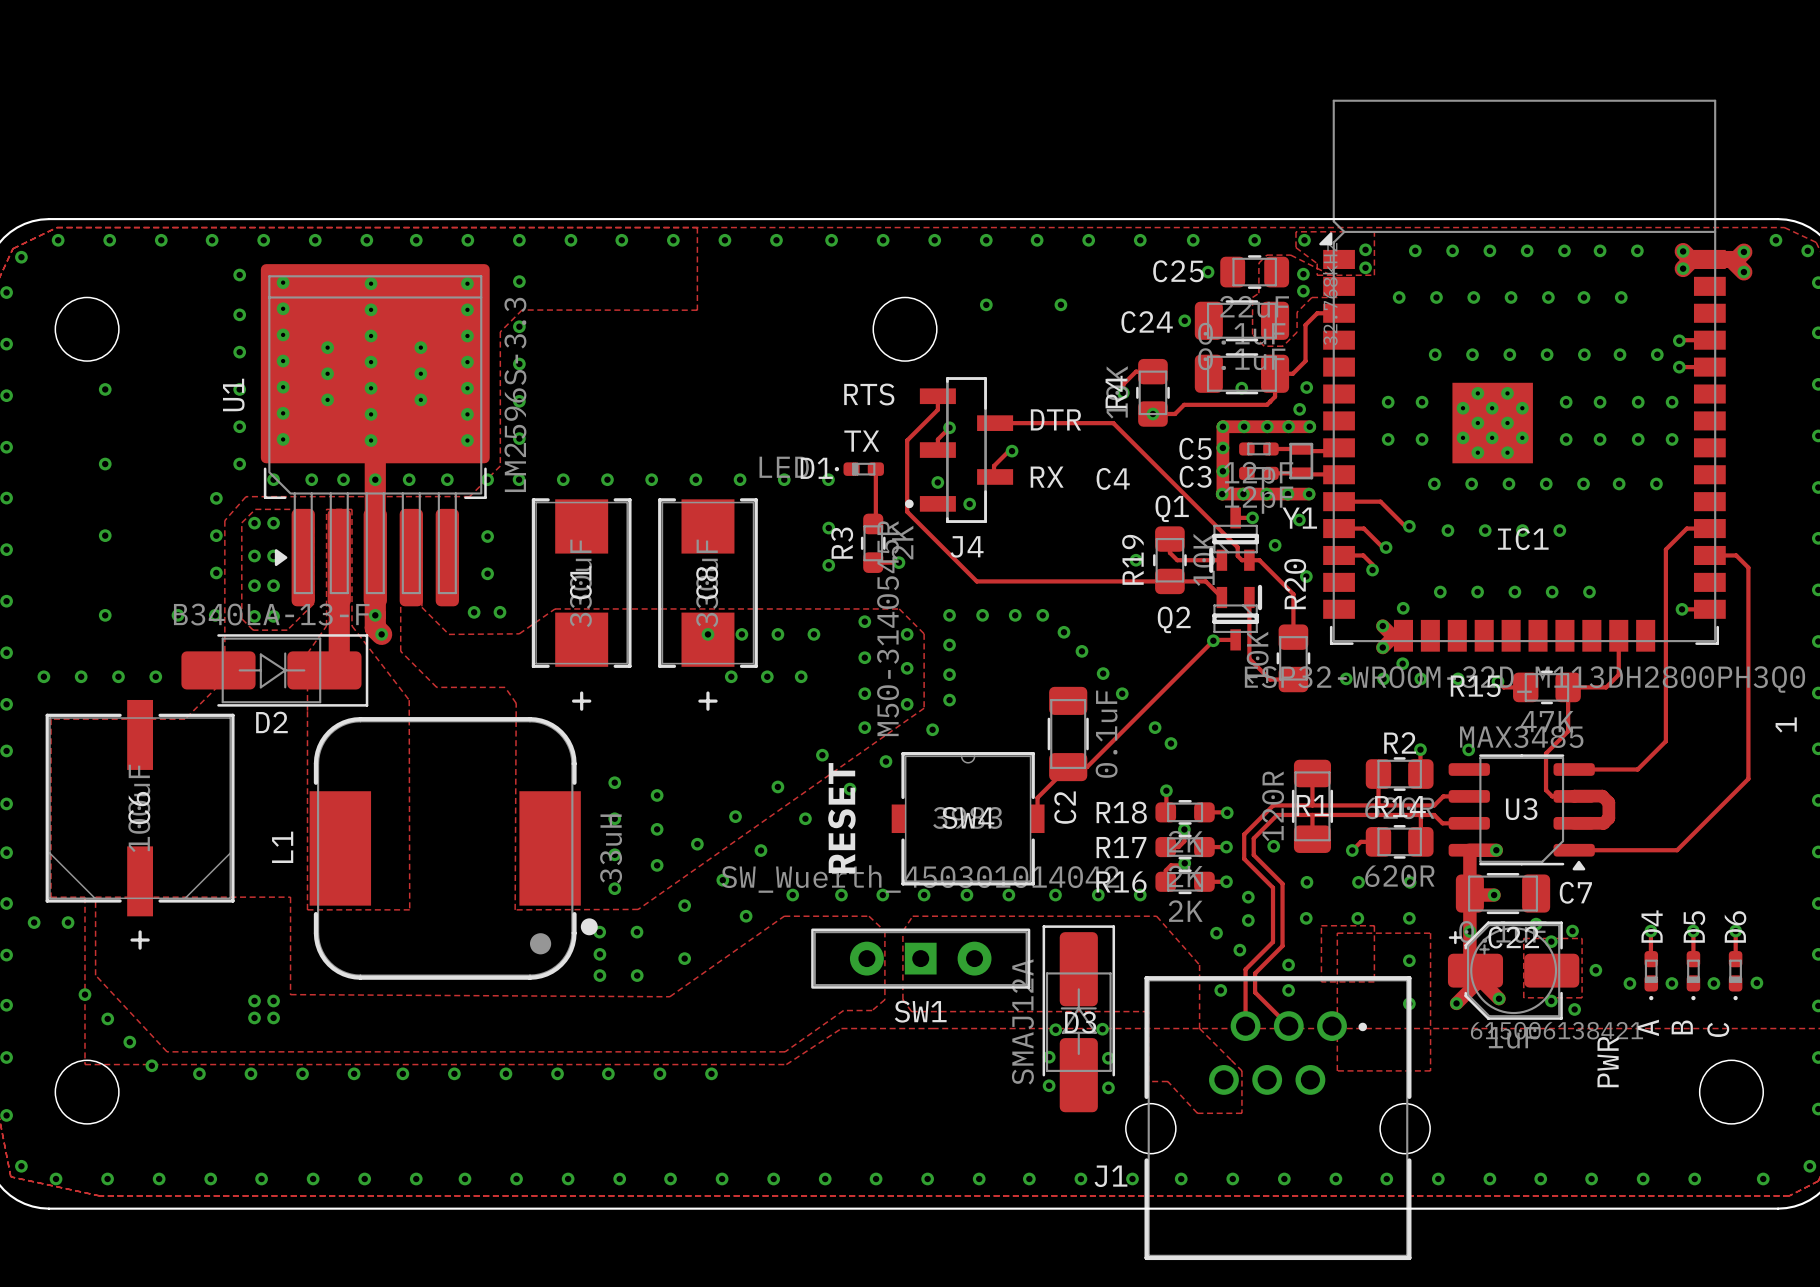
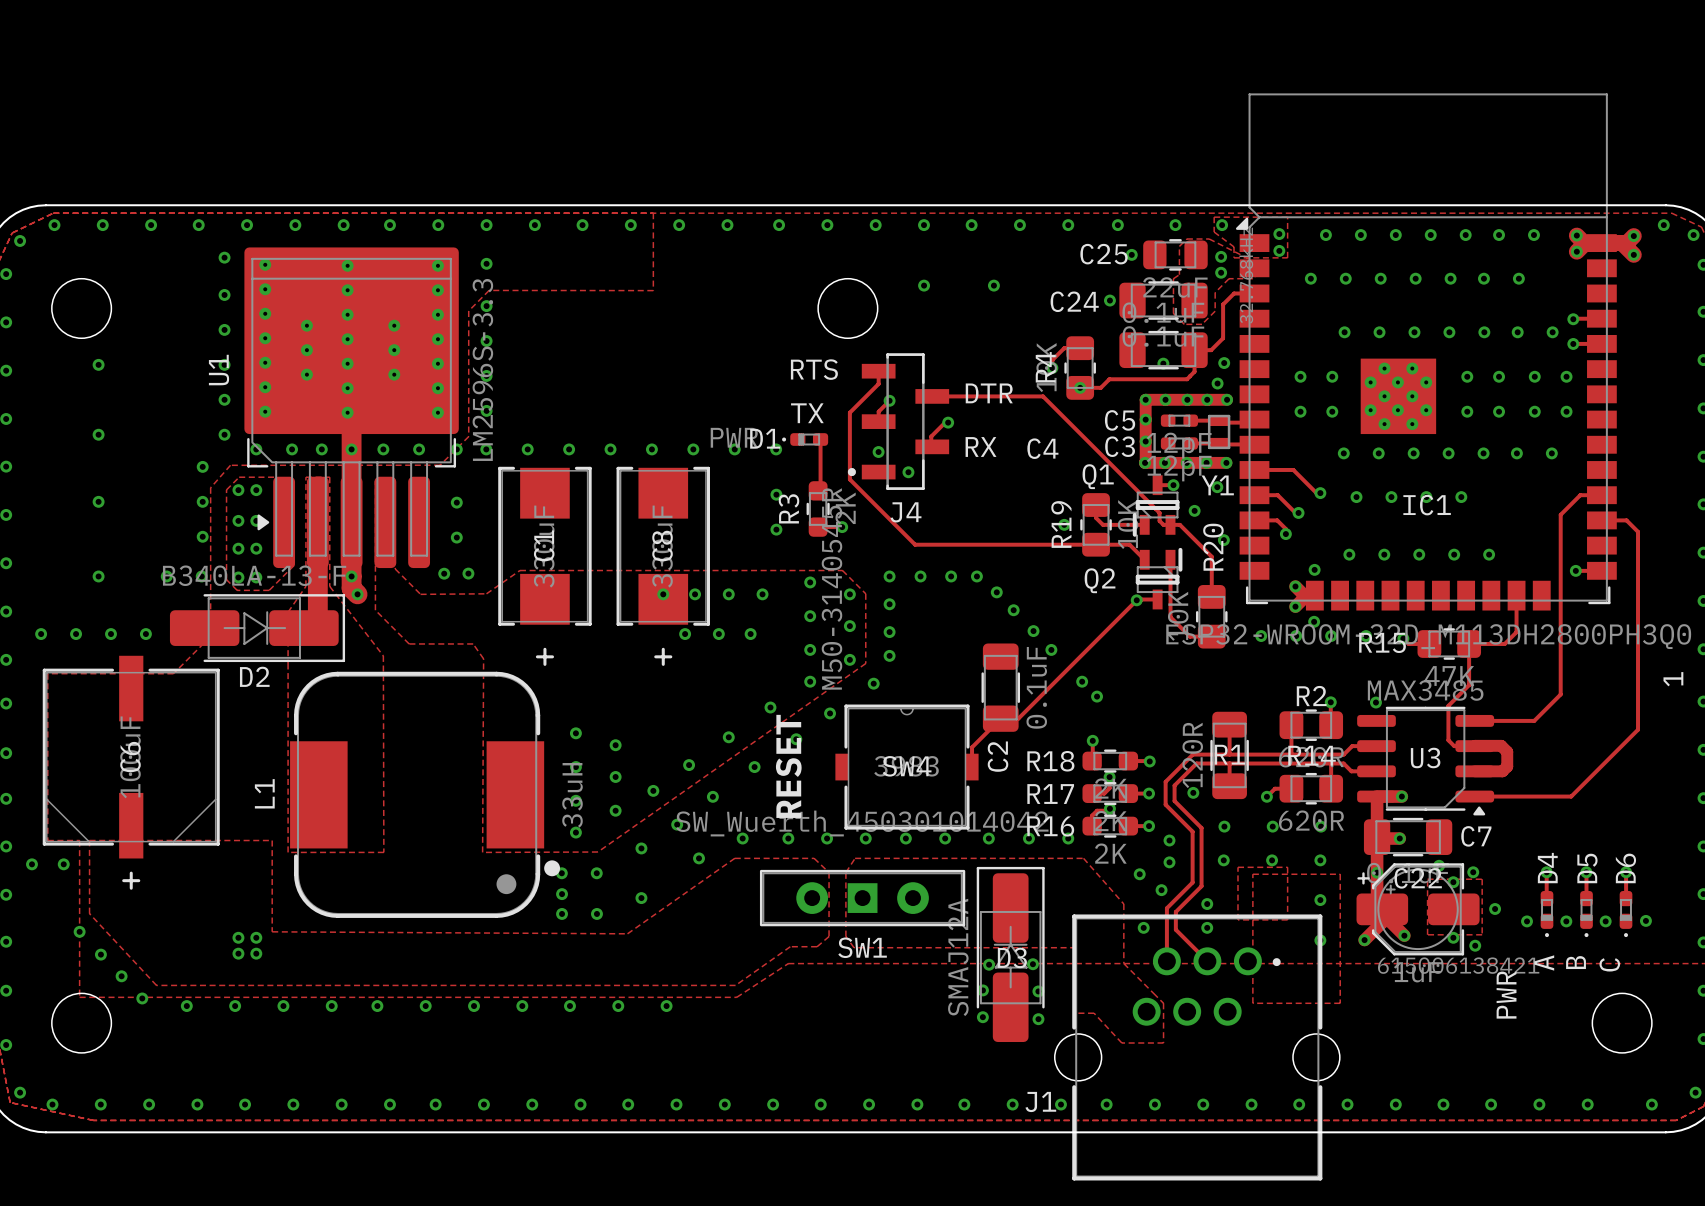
D1 value: LED (784, 467) -> PWR (734, 437)

